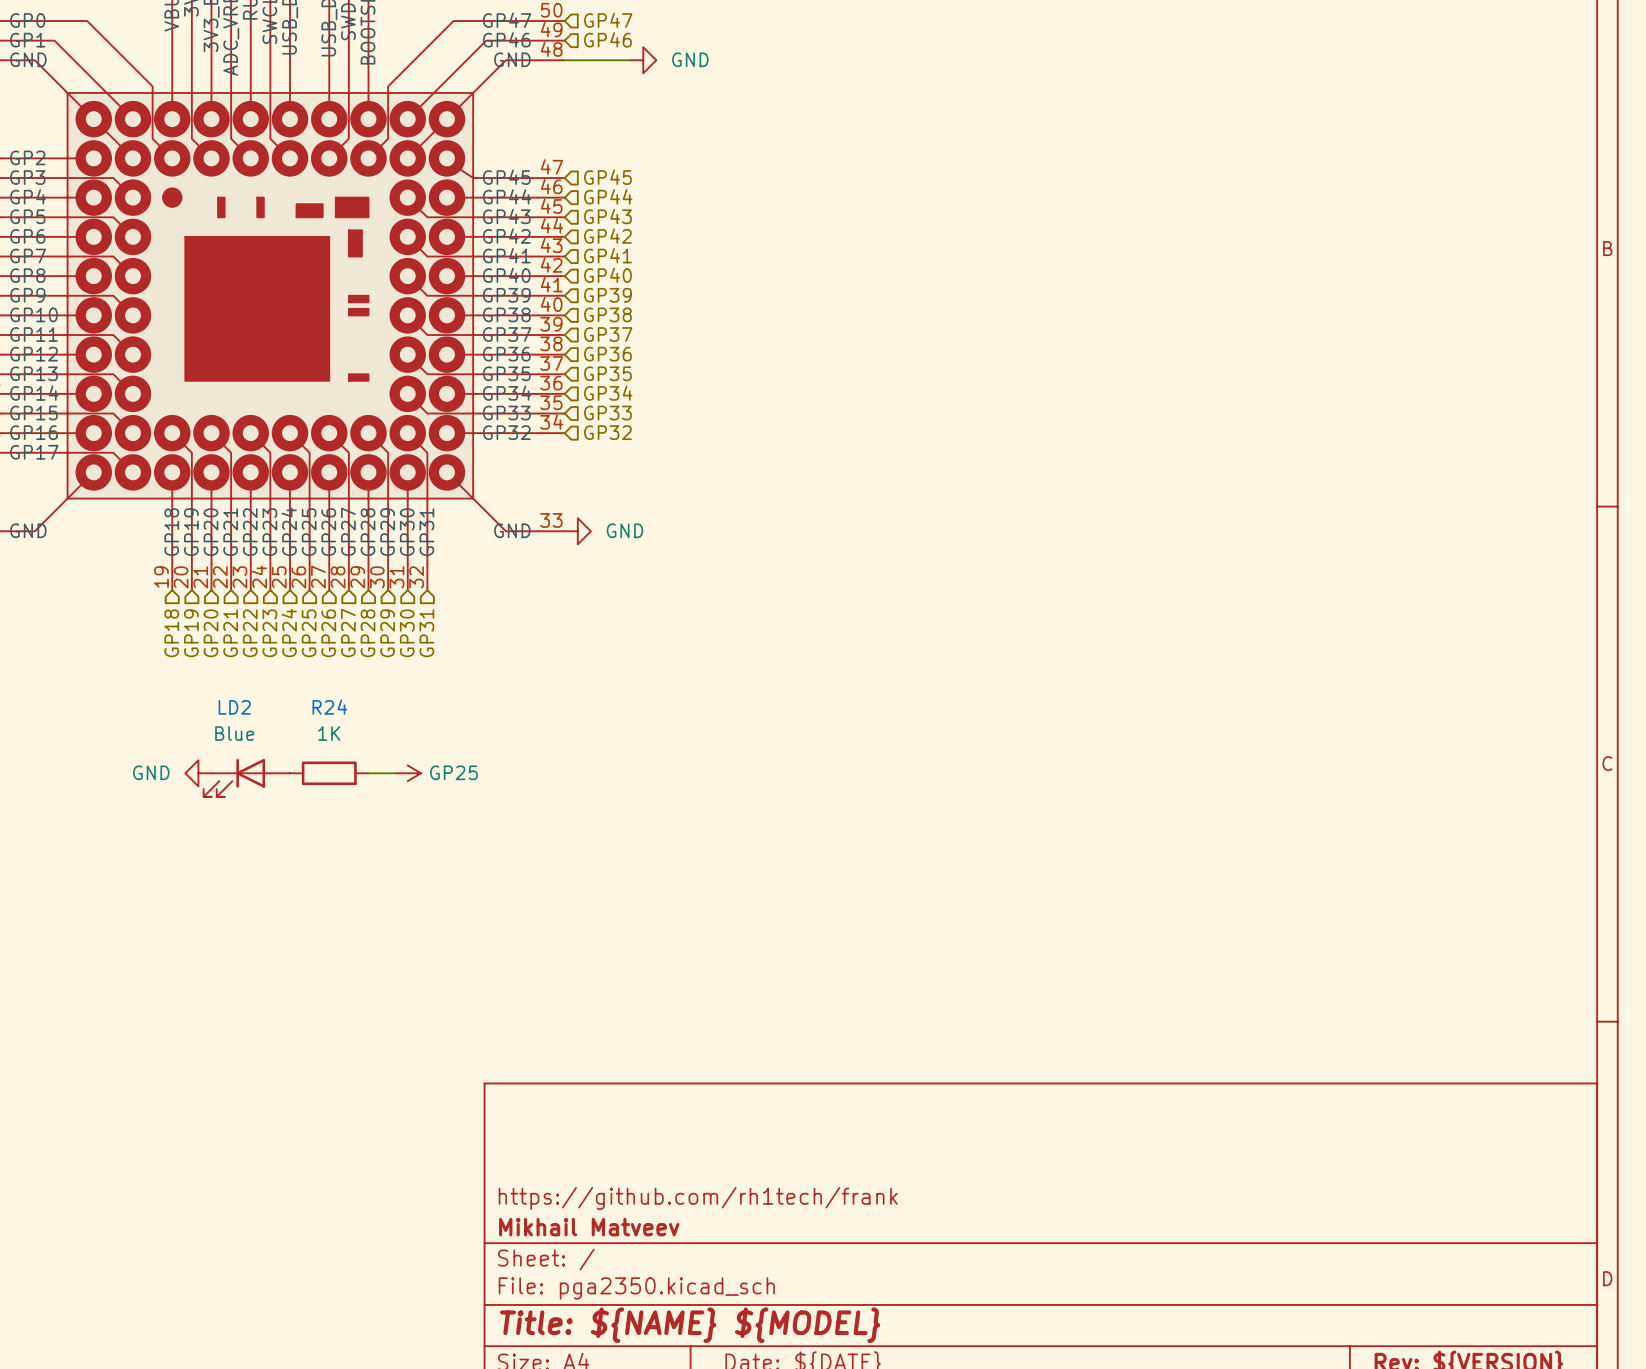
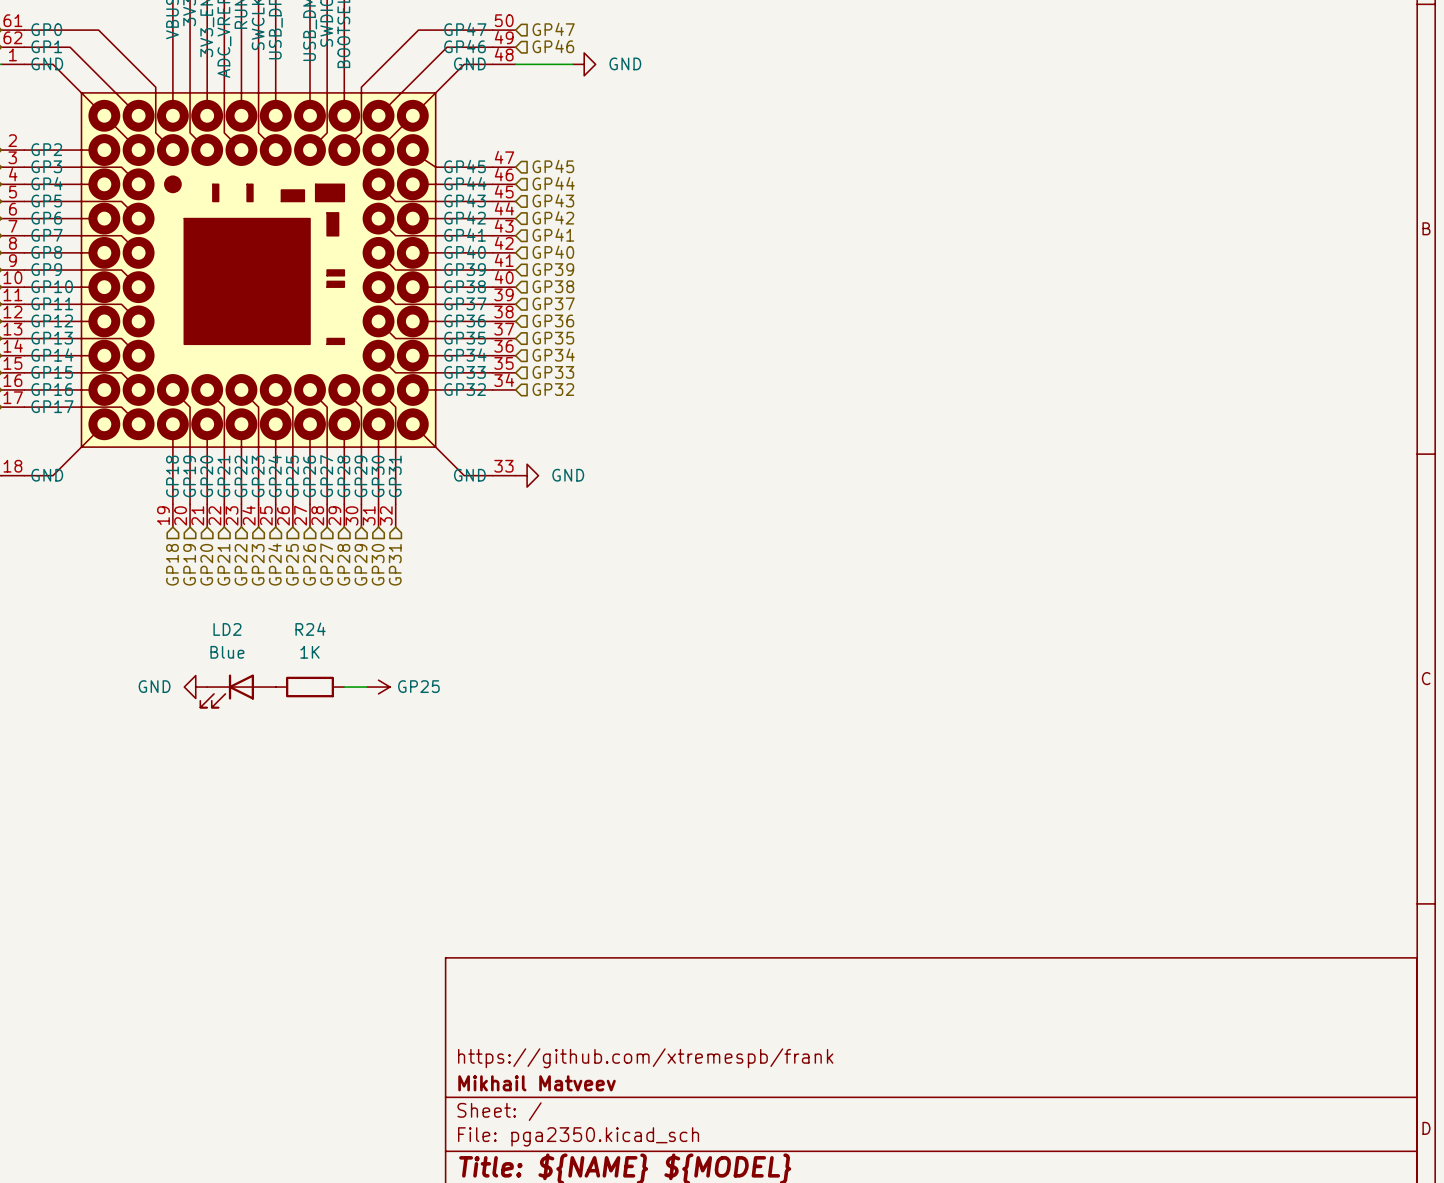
title block: https://github.com/rh1tech/frank (698, 1198) -> https://github.com/xtremespb/frank (645, 1058)

